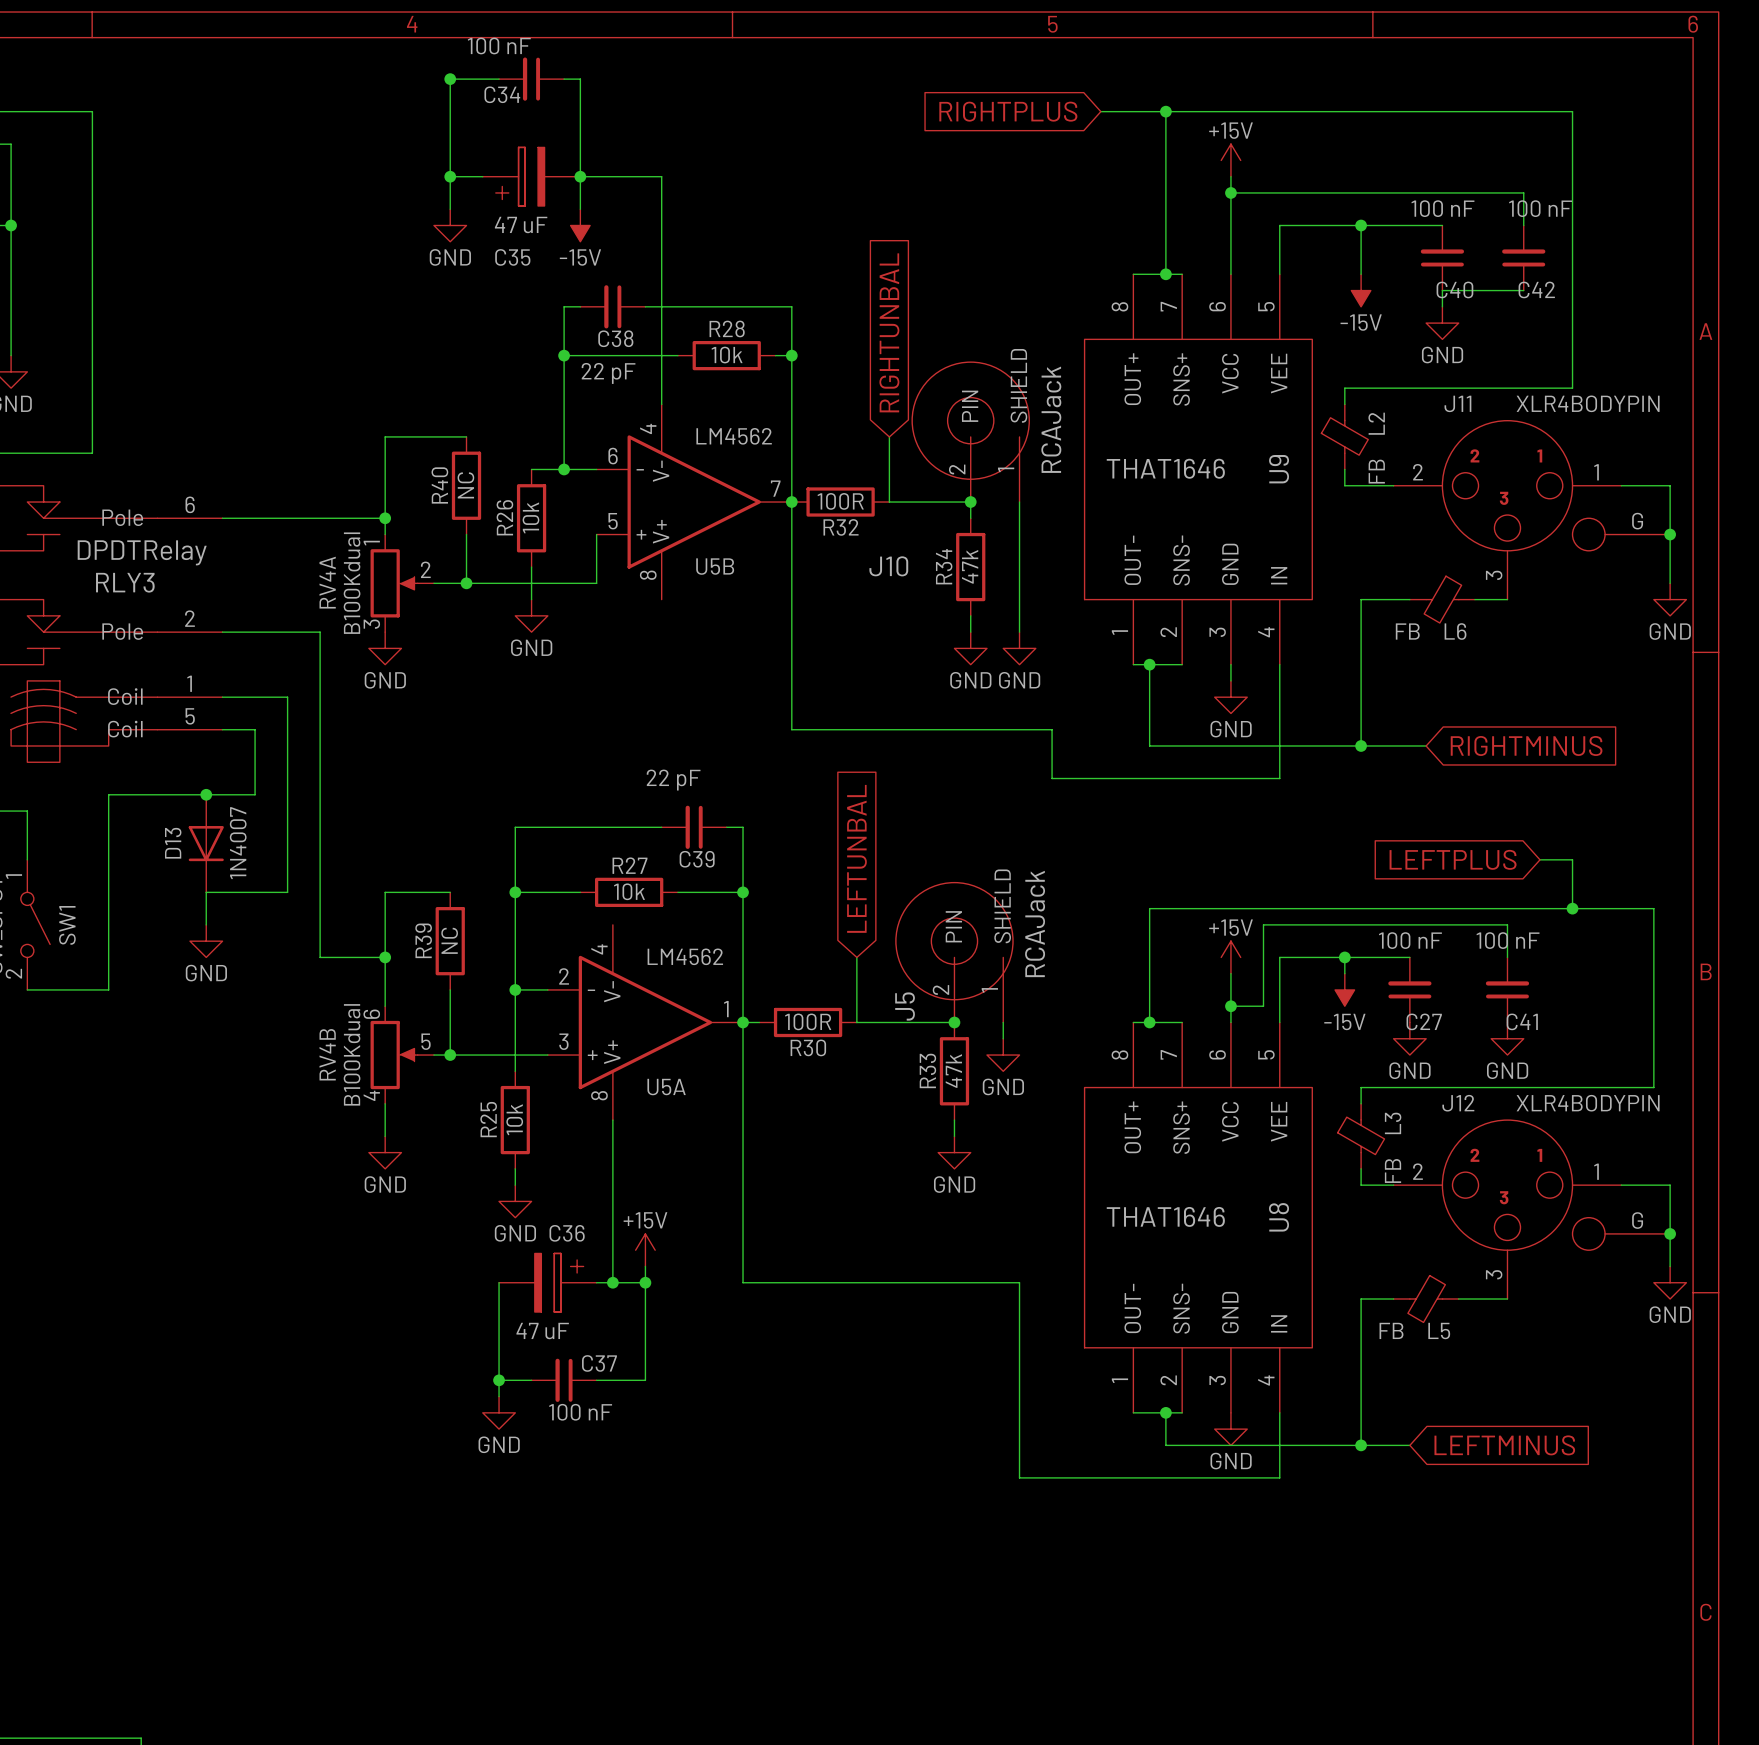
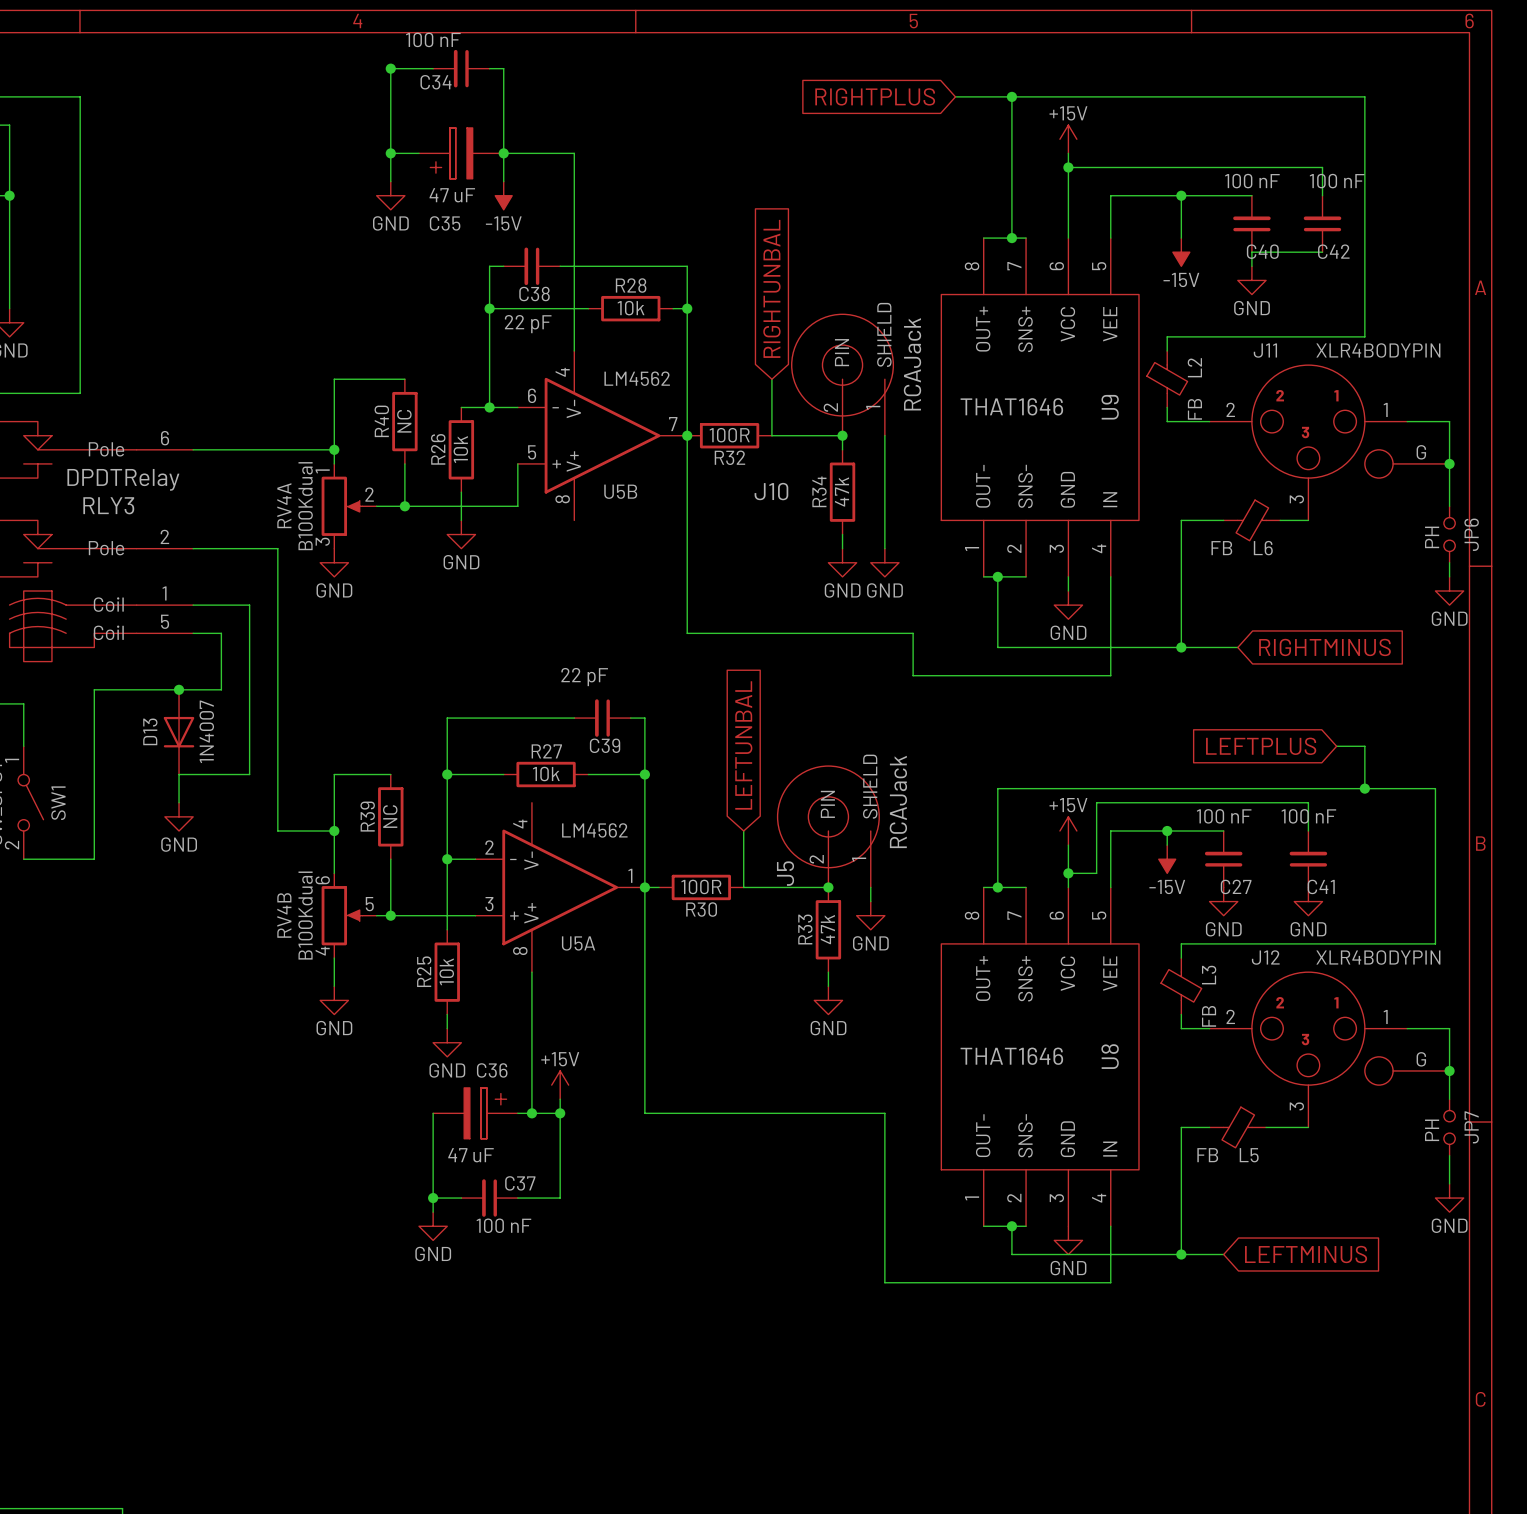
power symbol position: GND (1670, 599) -> GND (1449, 591)
JP6: none -> PH (1449, 534)
wire: none -> (1449, 562) (1449, 576)
power symbol position: GND (1670, 1282) -> GND (1449, 1198)
JP7: none -> PH (1449, 1127)
wire: none -> (1449, 1155) (1449, 1183)

